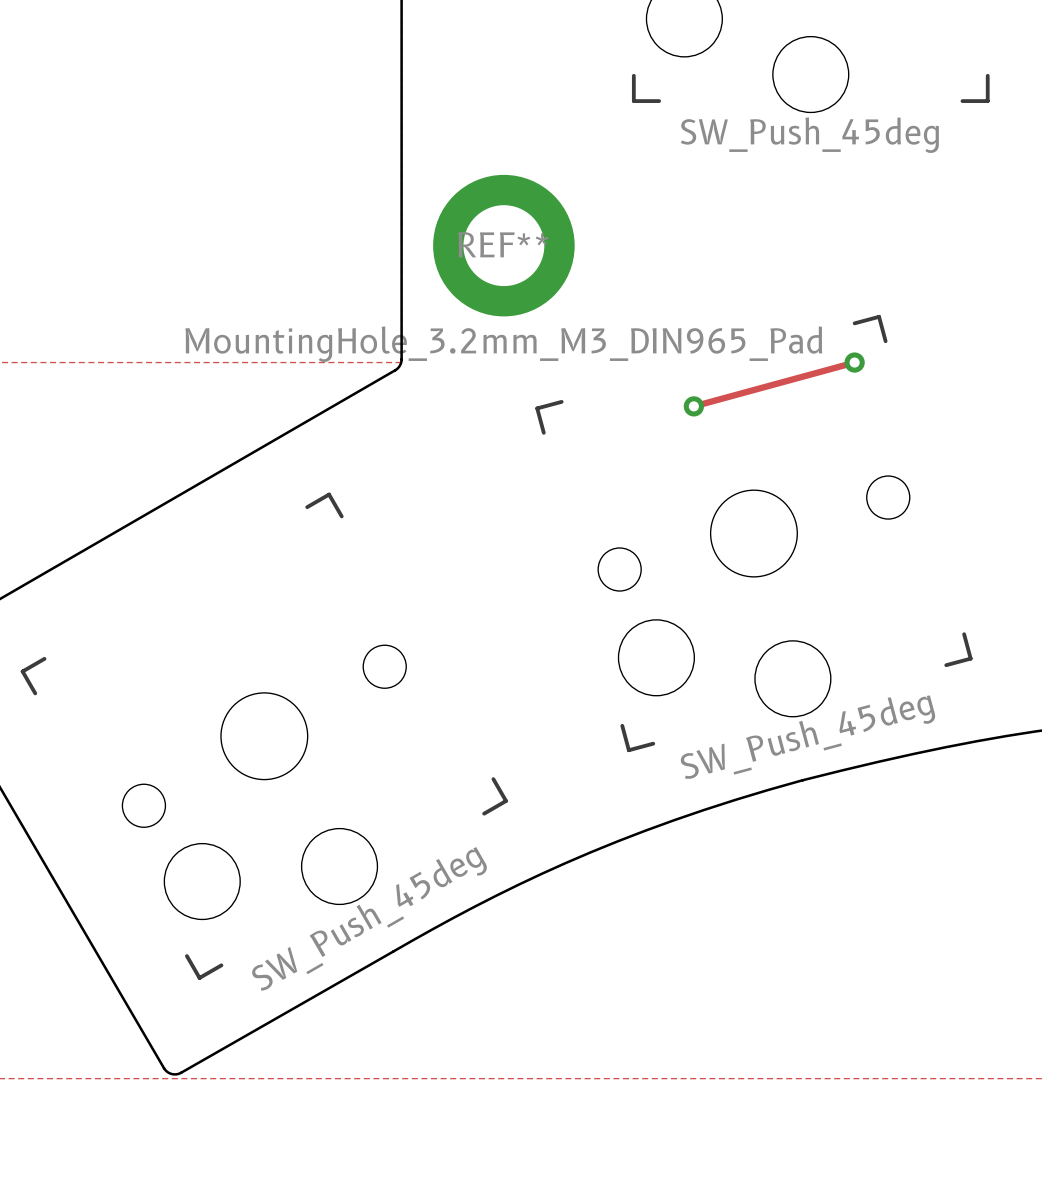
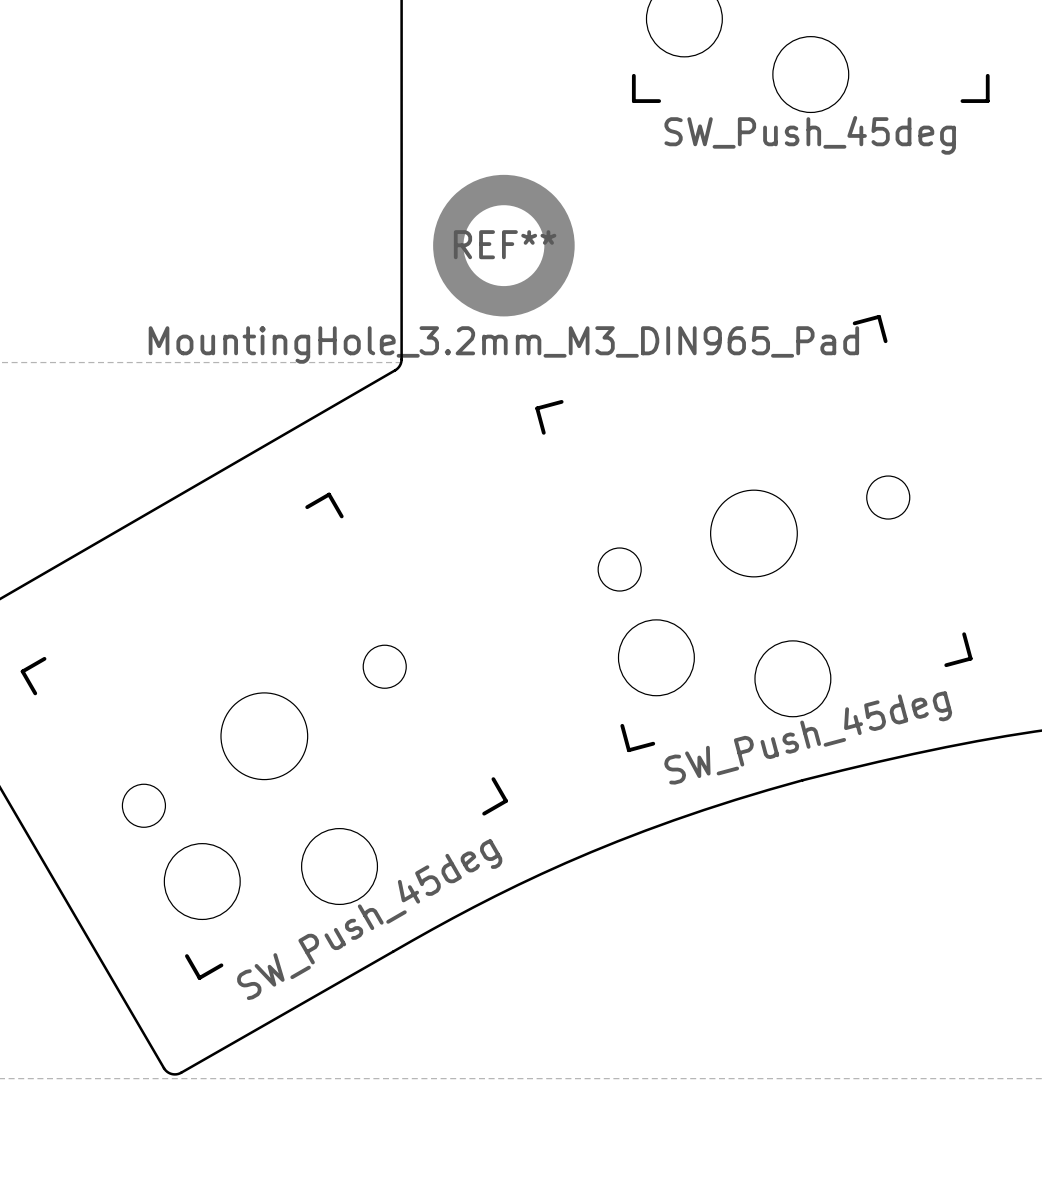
track: (854, 362) (693, 406) -> none
via: (854, 362) -> none
via: (693, 406) -> none

